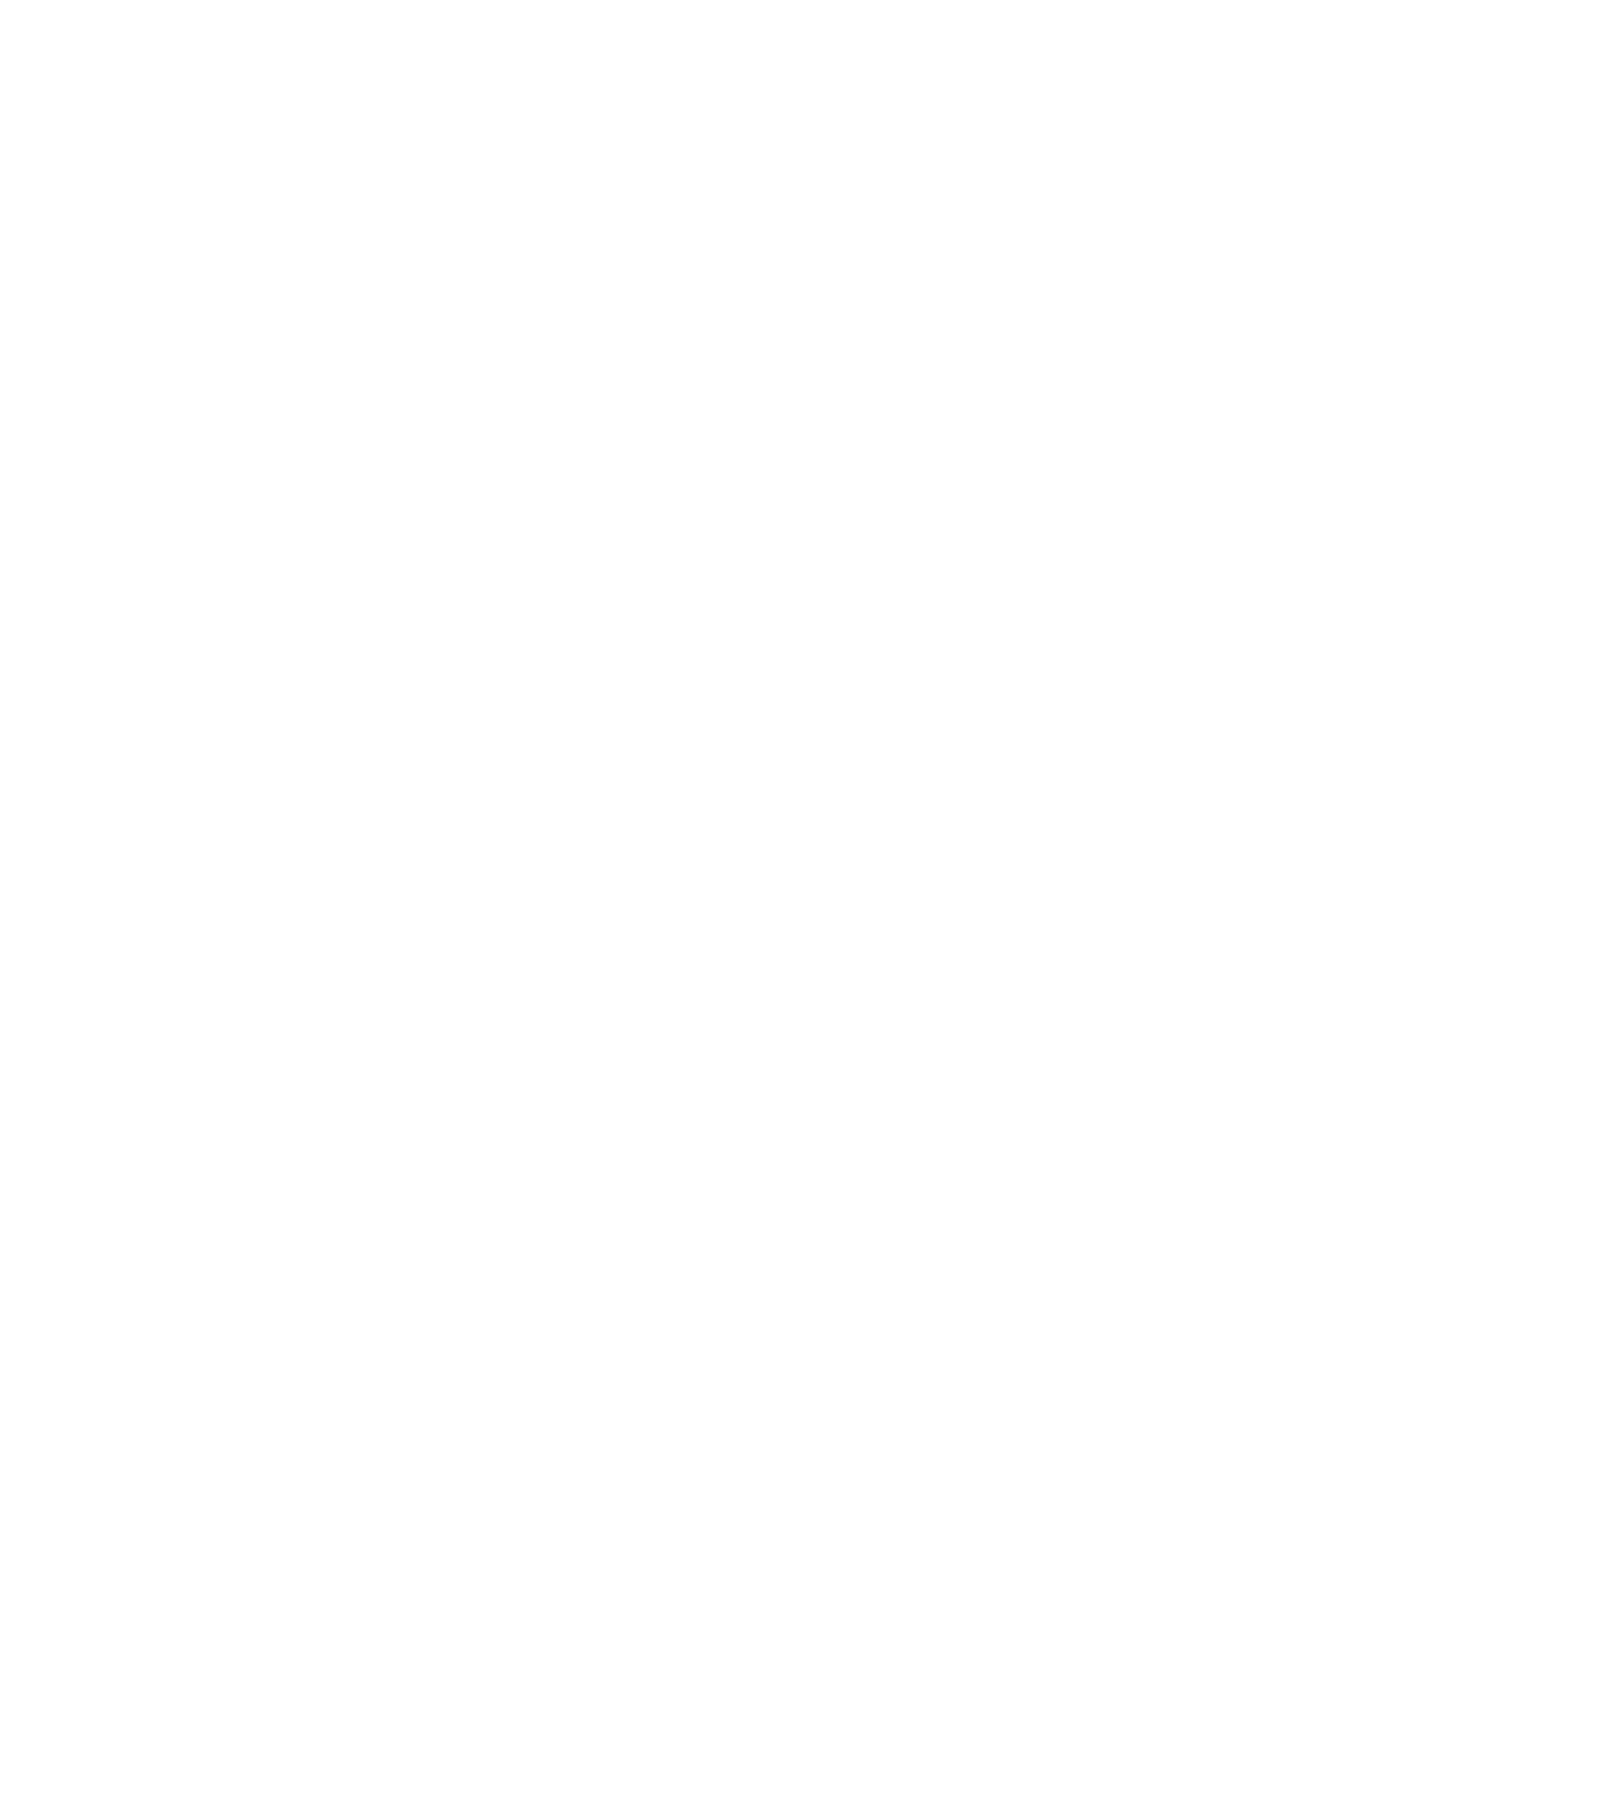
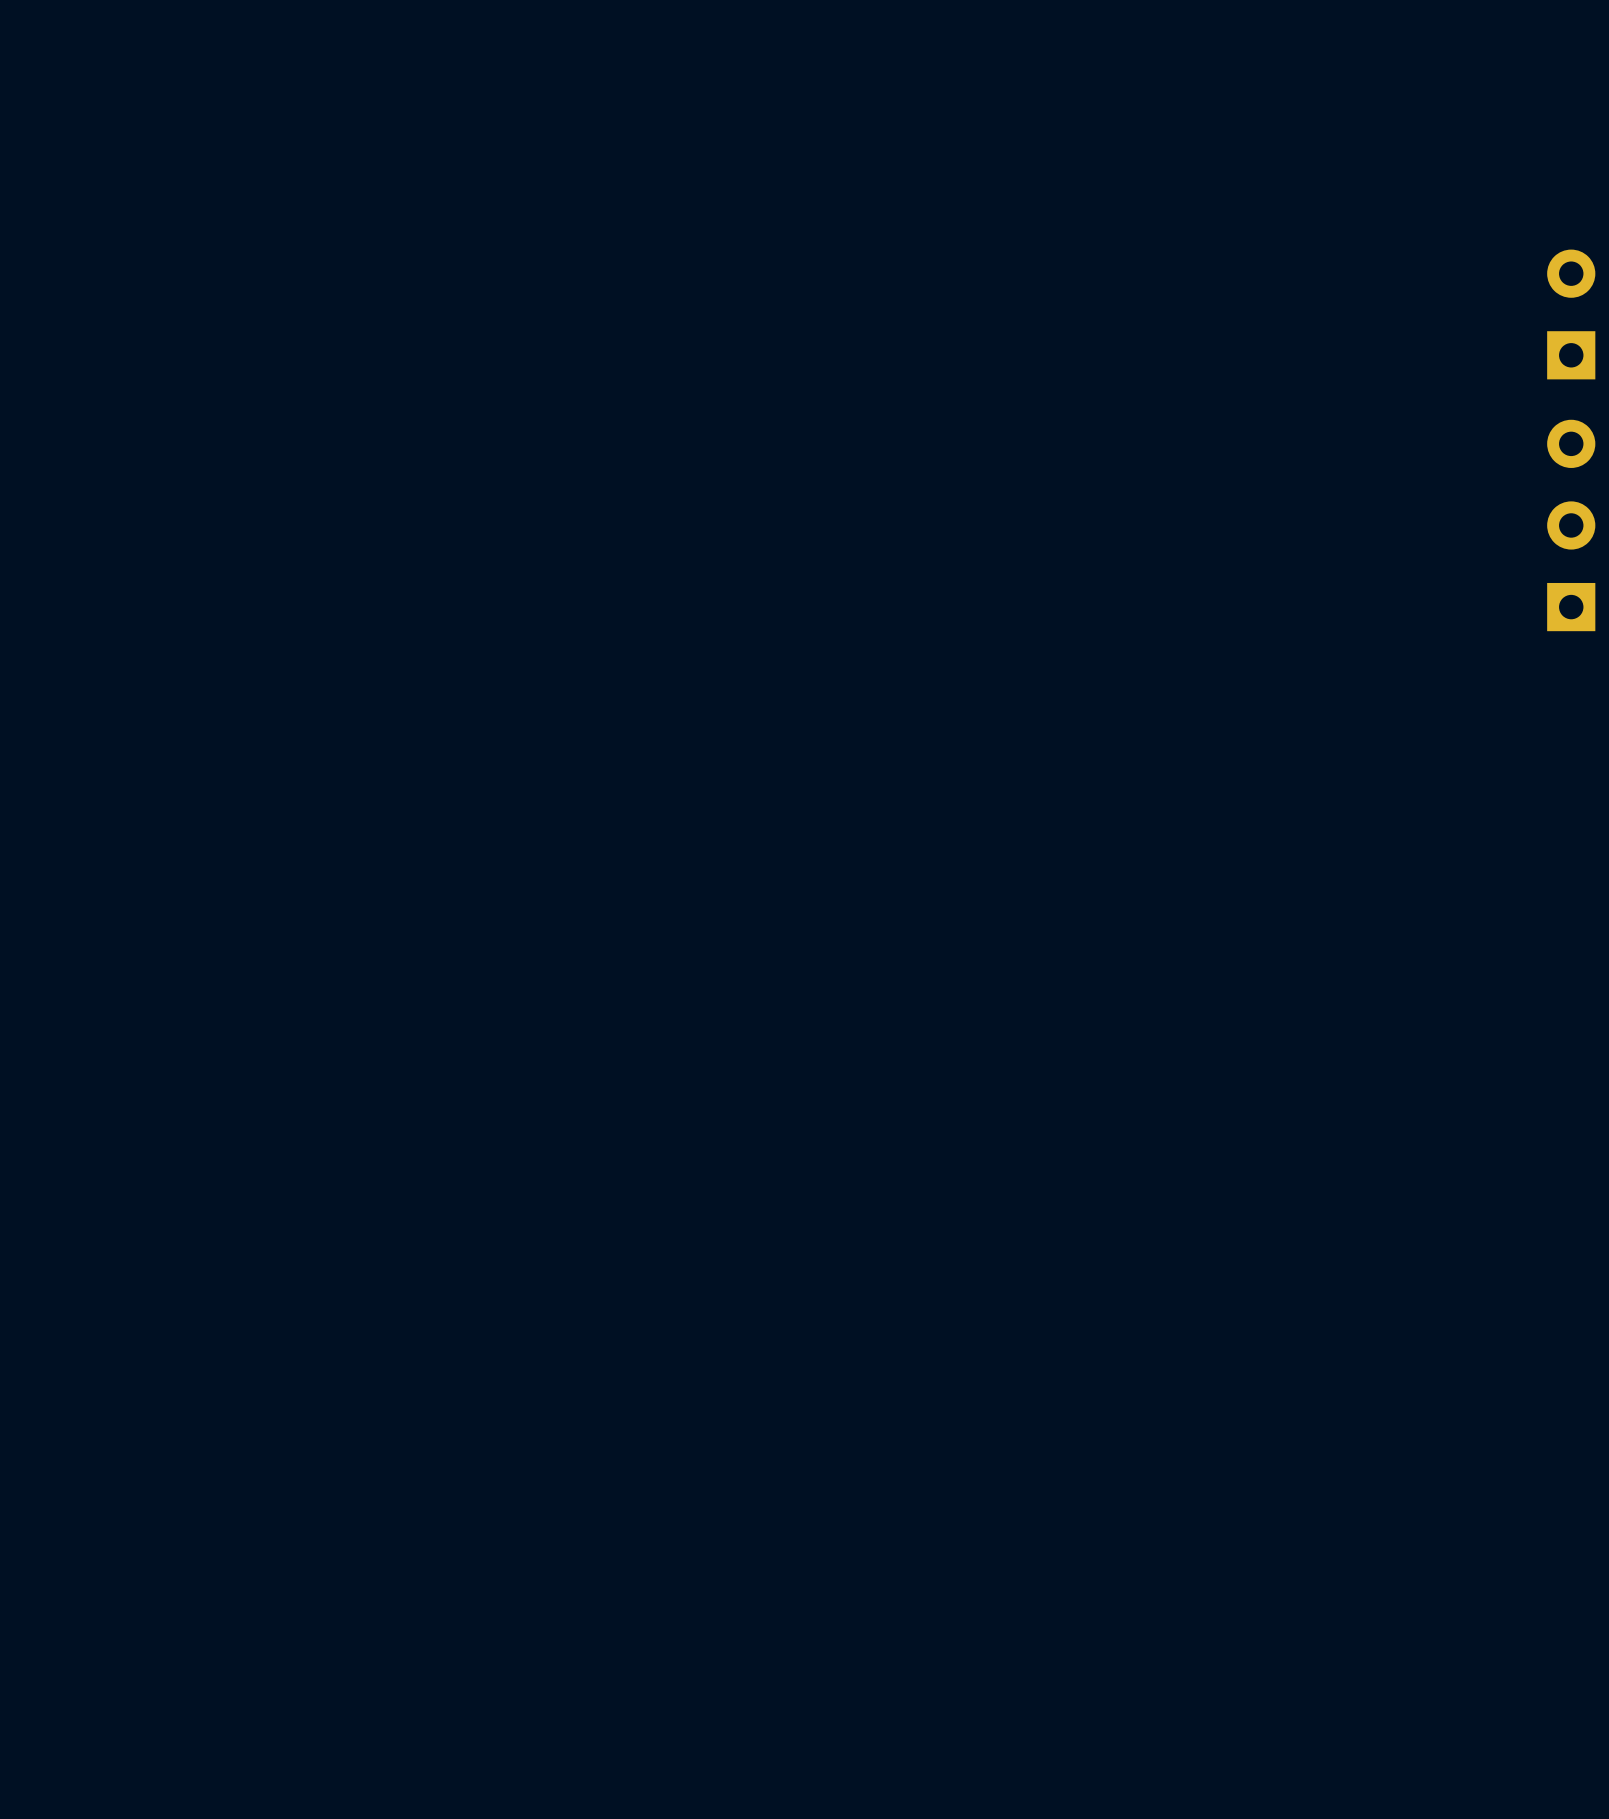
part: none -> (1571, 314)
part: none -> (1571, 525)

